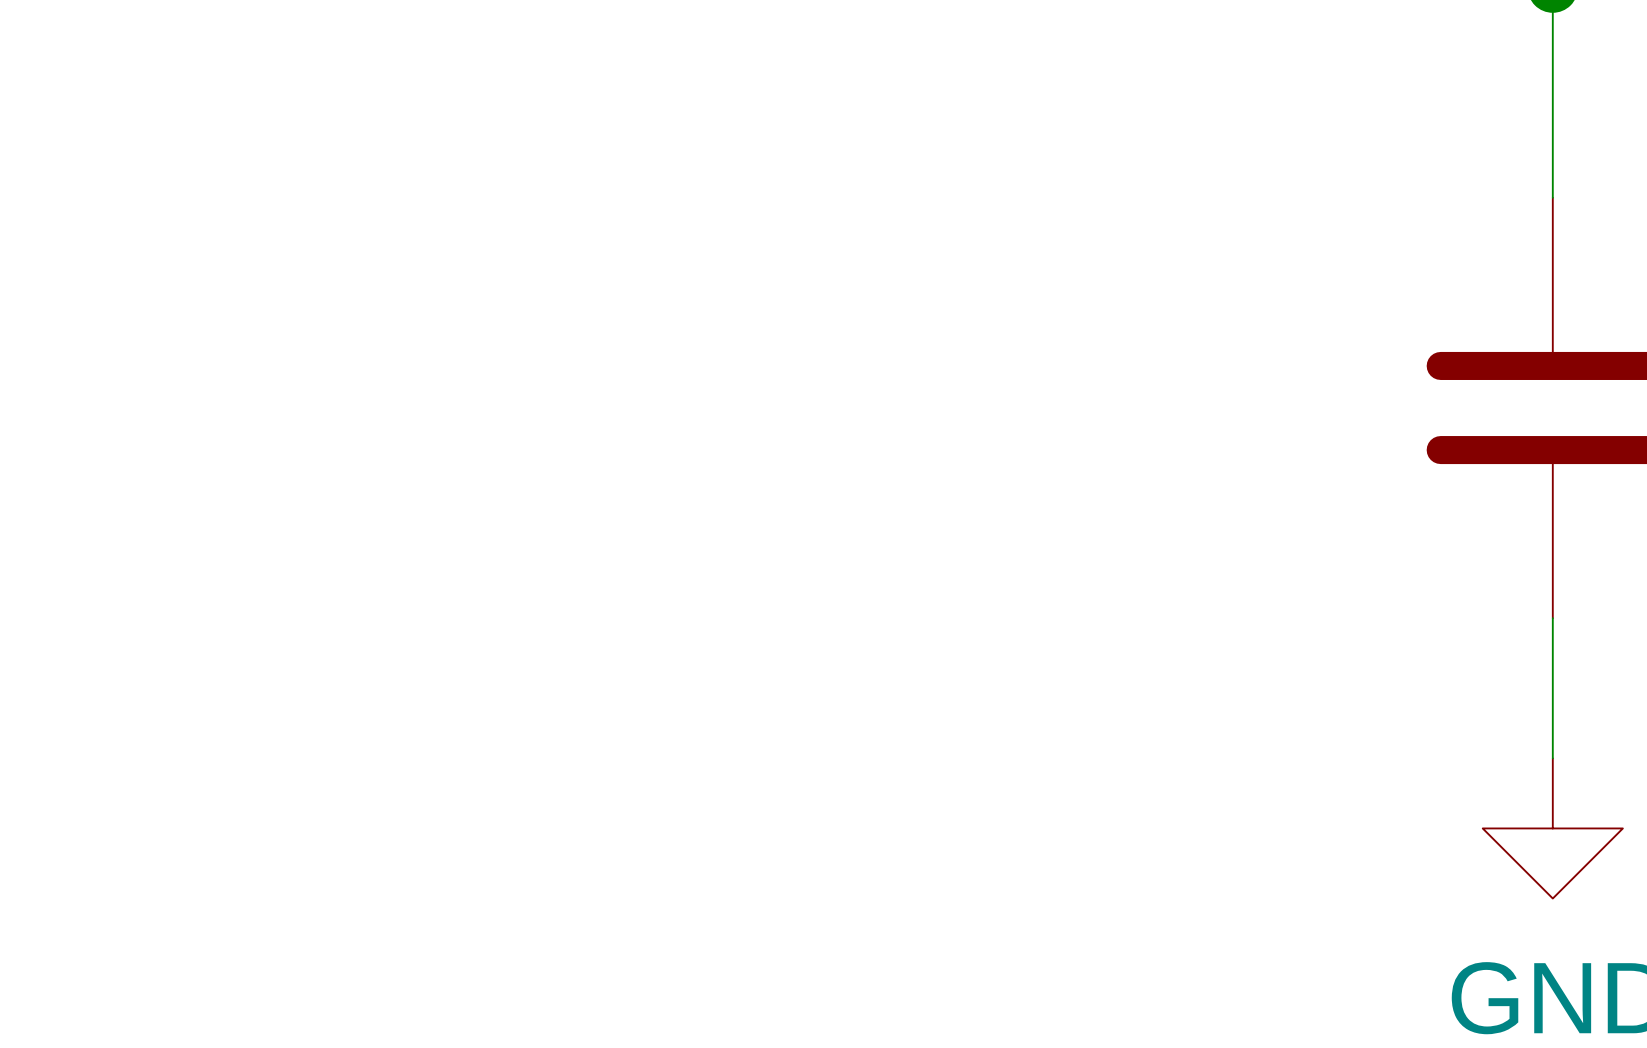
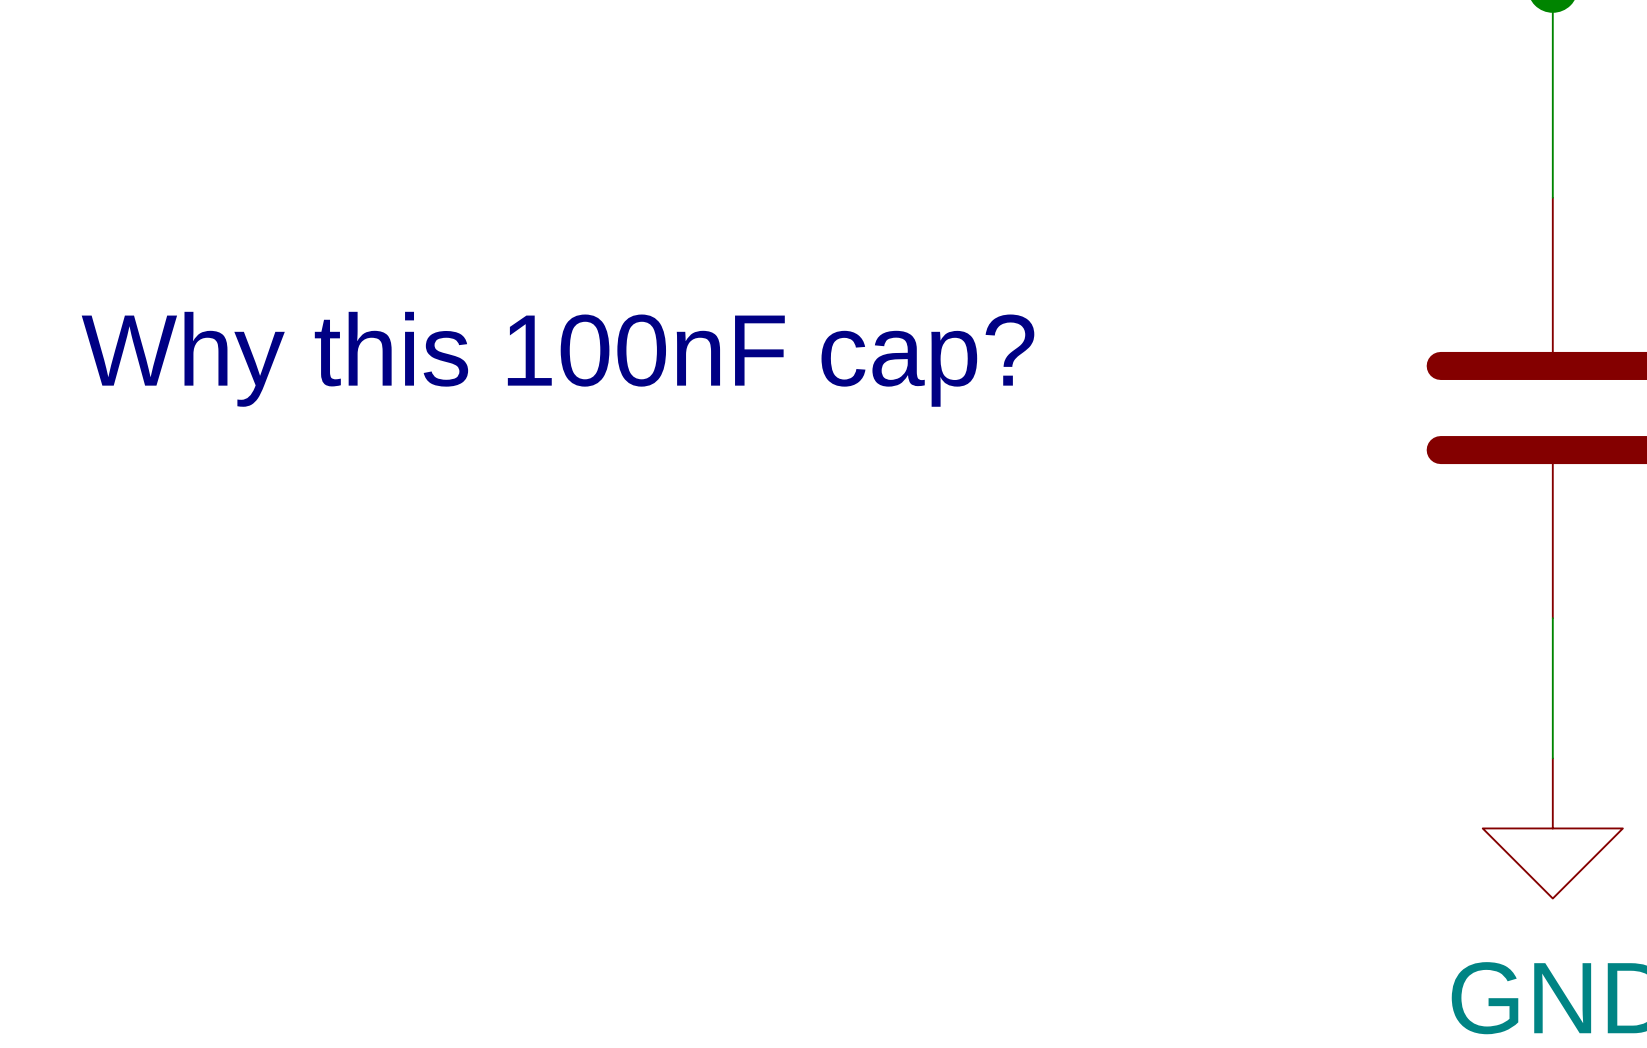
text: none -> Why this 100nF cap? (558, 359)

